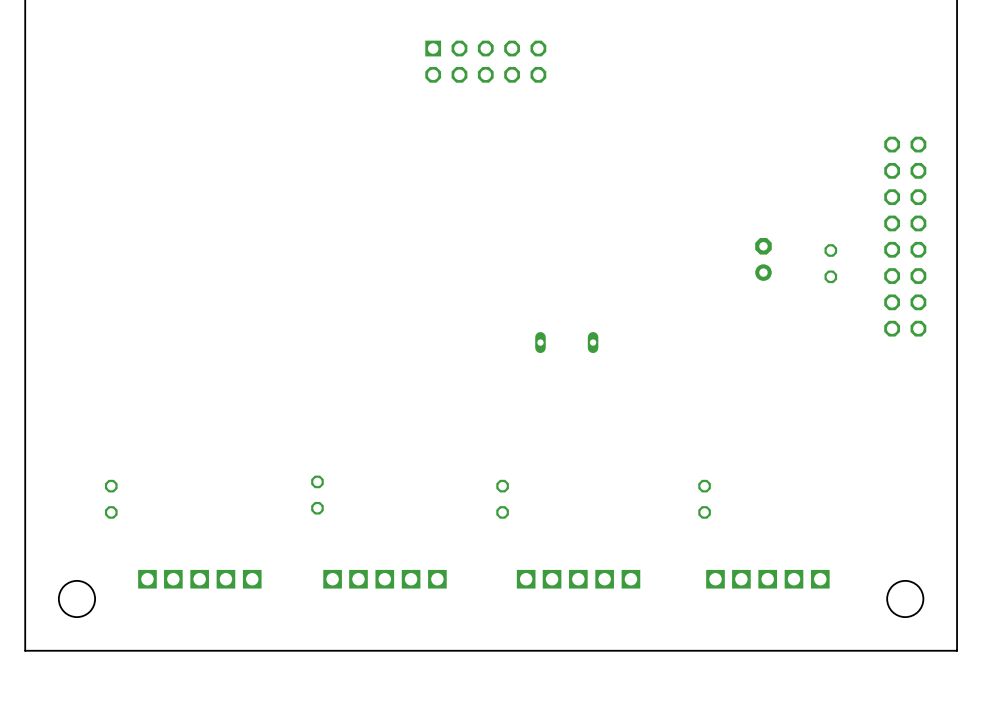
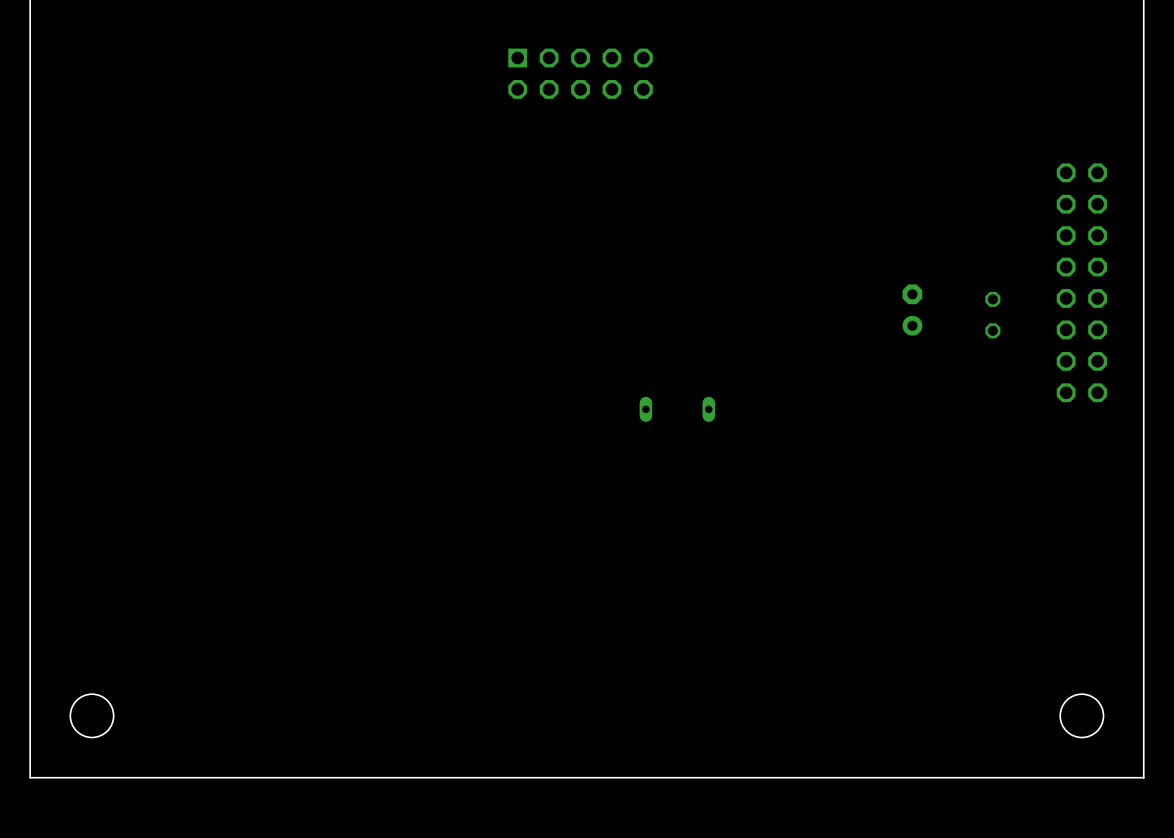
part: (317, 495) -> none
part: (111, 499) -> none
part: (502, 499) -> none
part: (704, 499) -> none
part: (199, 579) -> none
part: (384, 579) -> none
part: (578, 579) -> none
part: (767, 579) -> none

